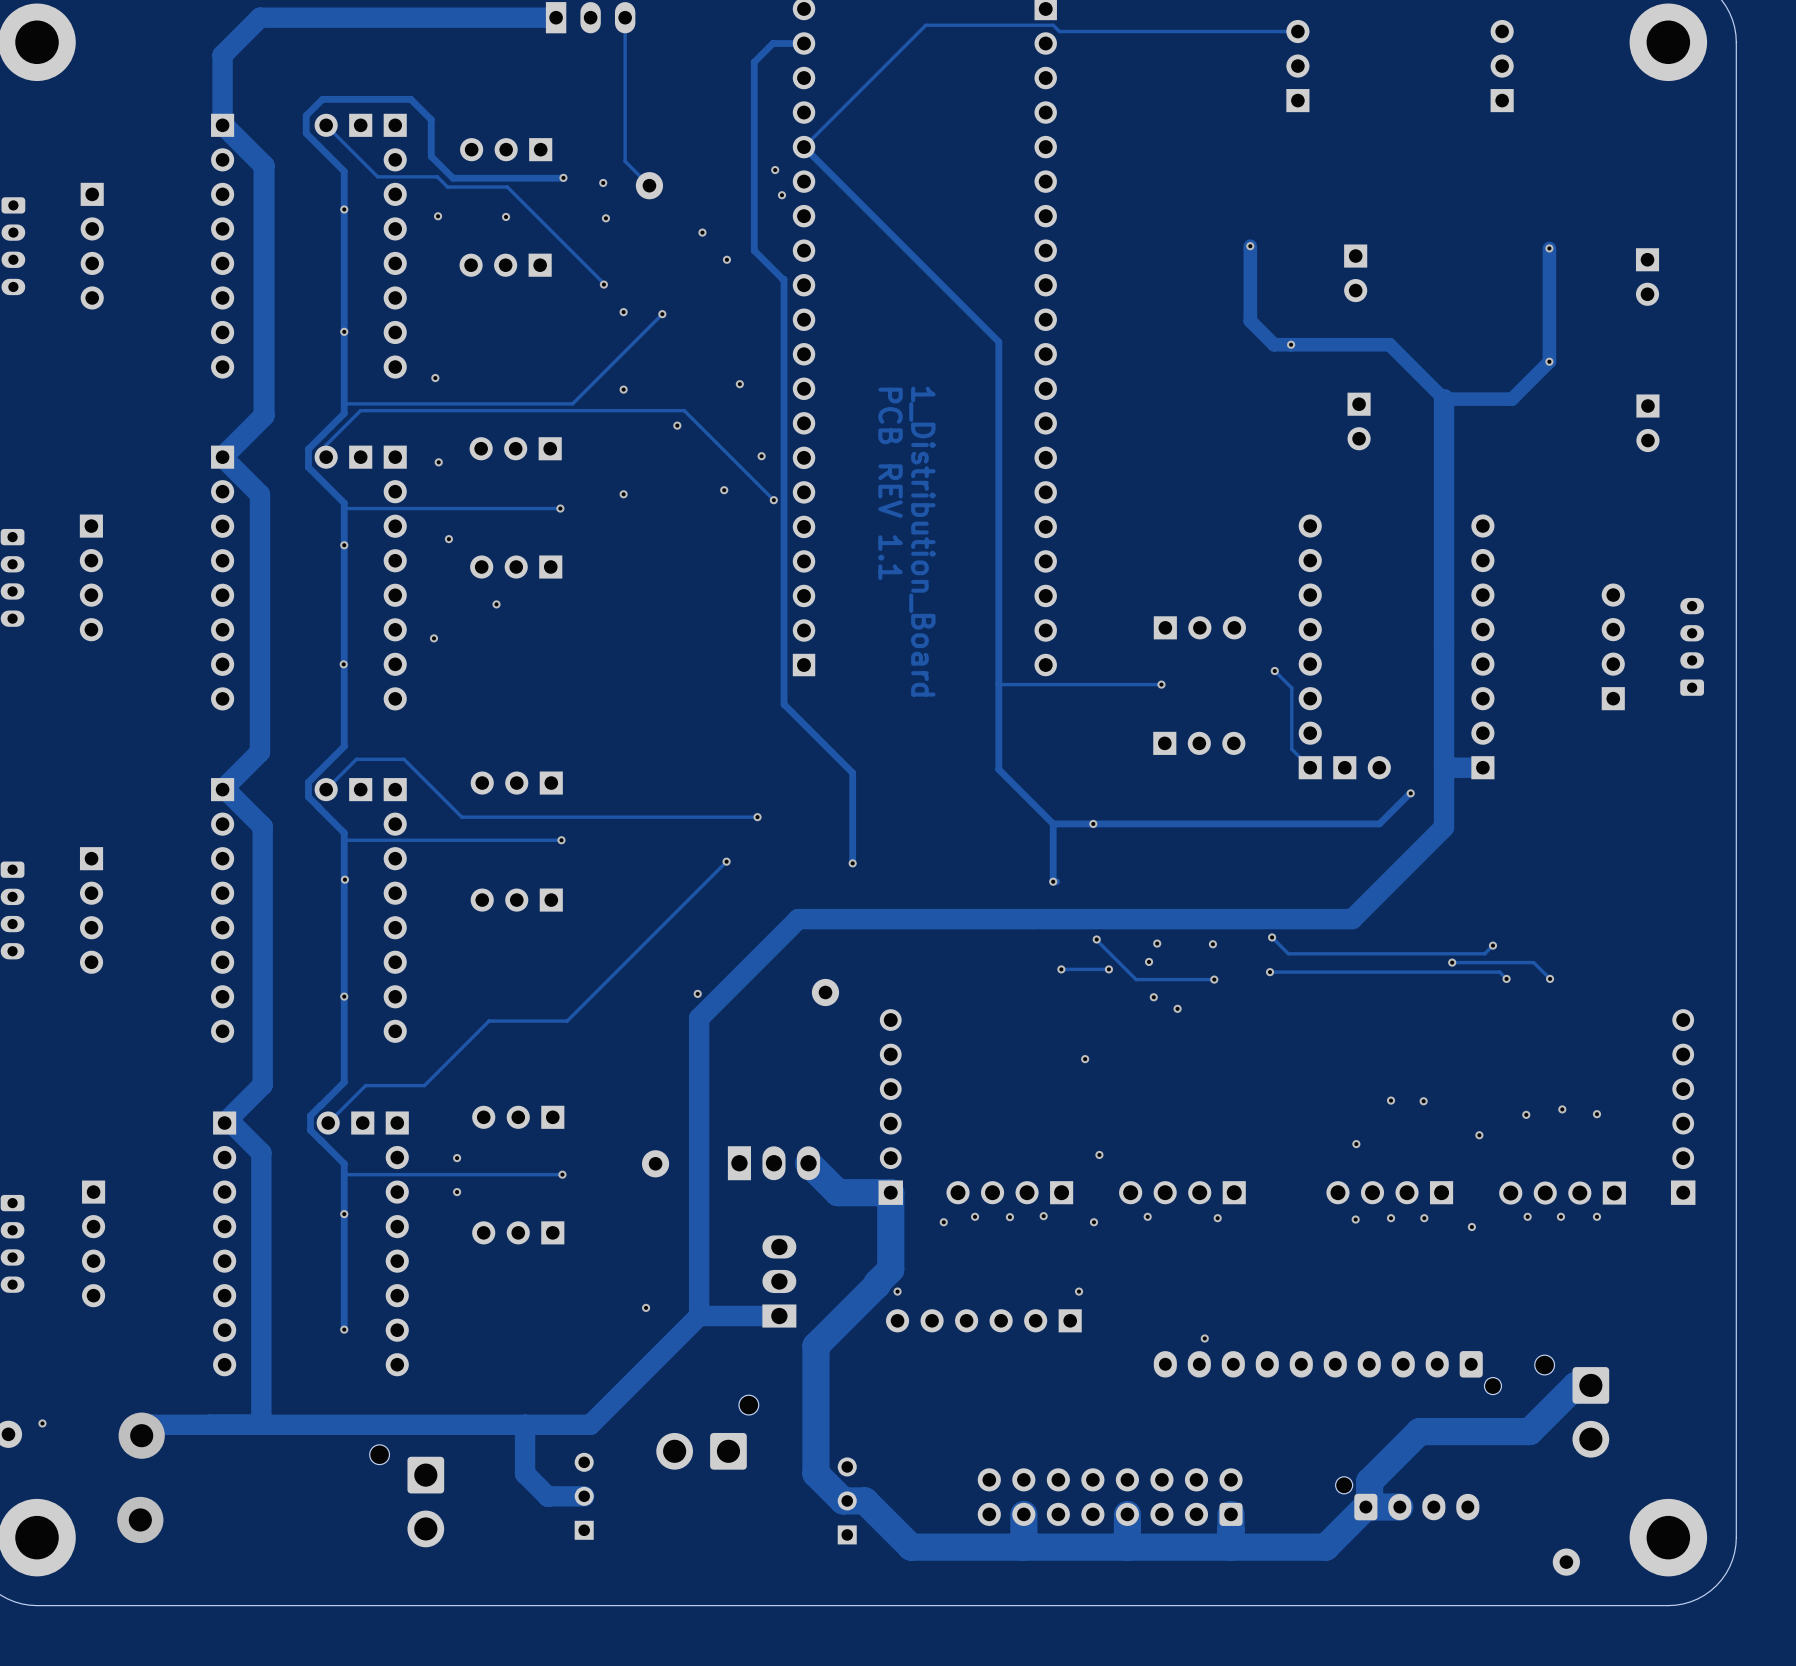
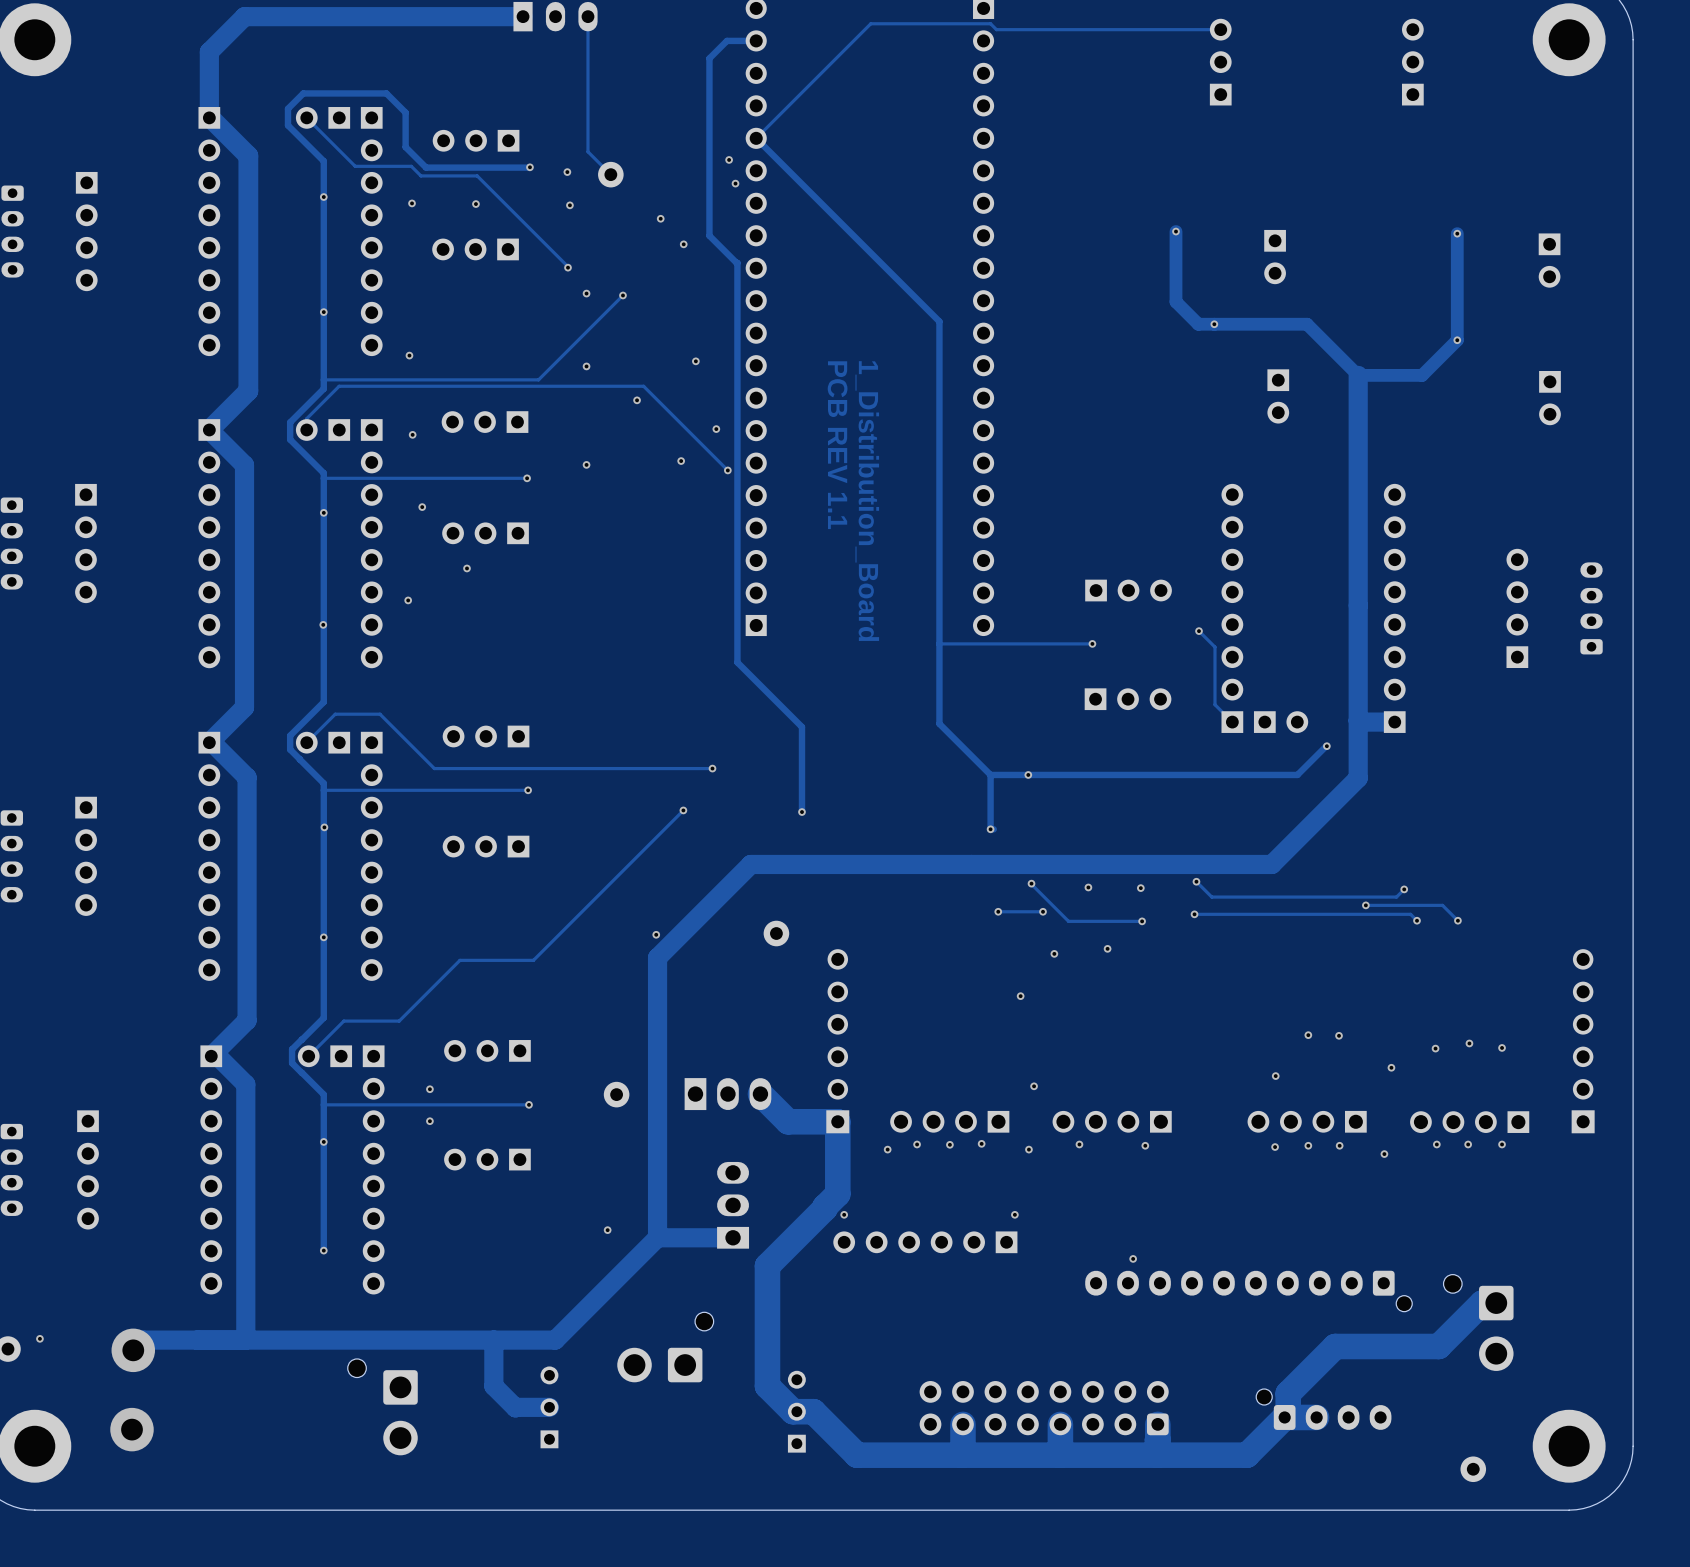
via: (1149, 961) -> none
via: (1153, 997) -> none
via: none -> (1054, 953)

